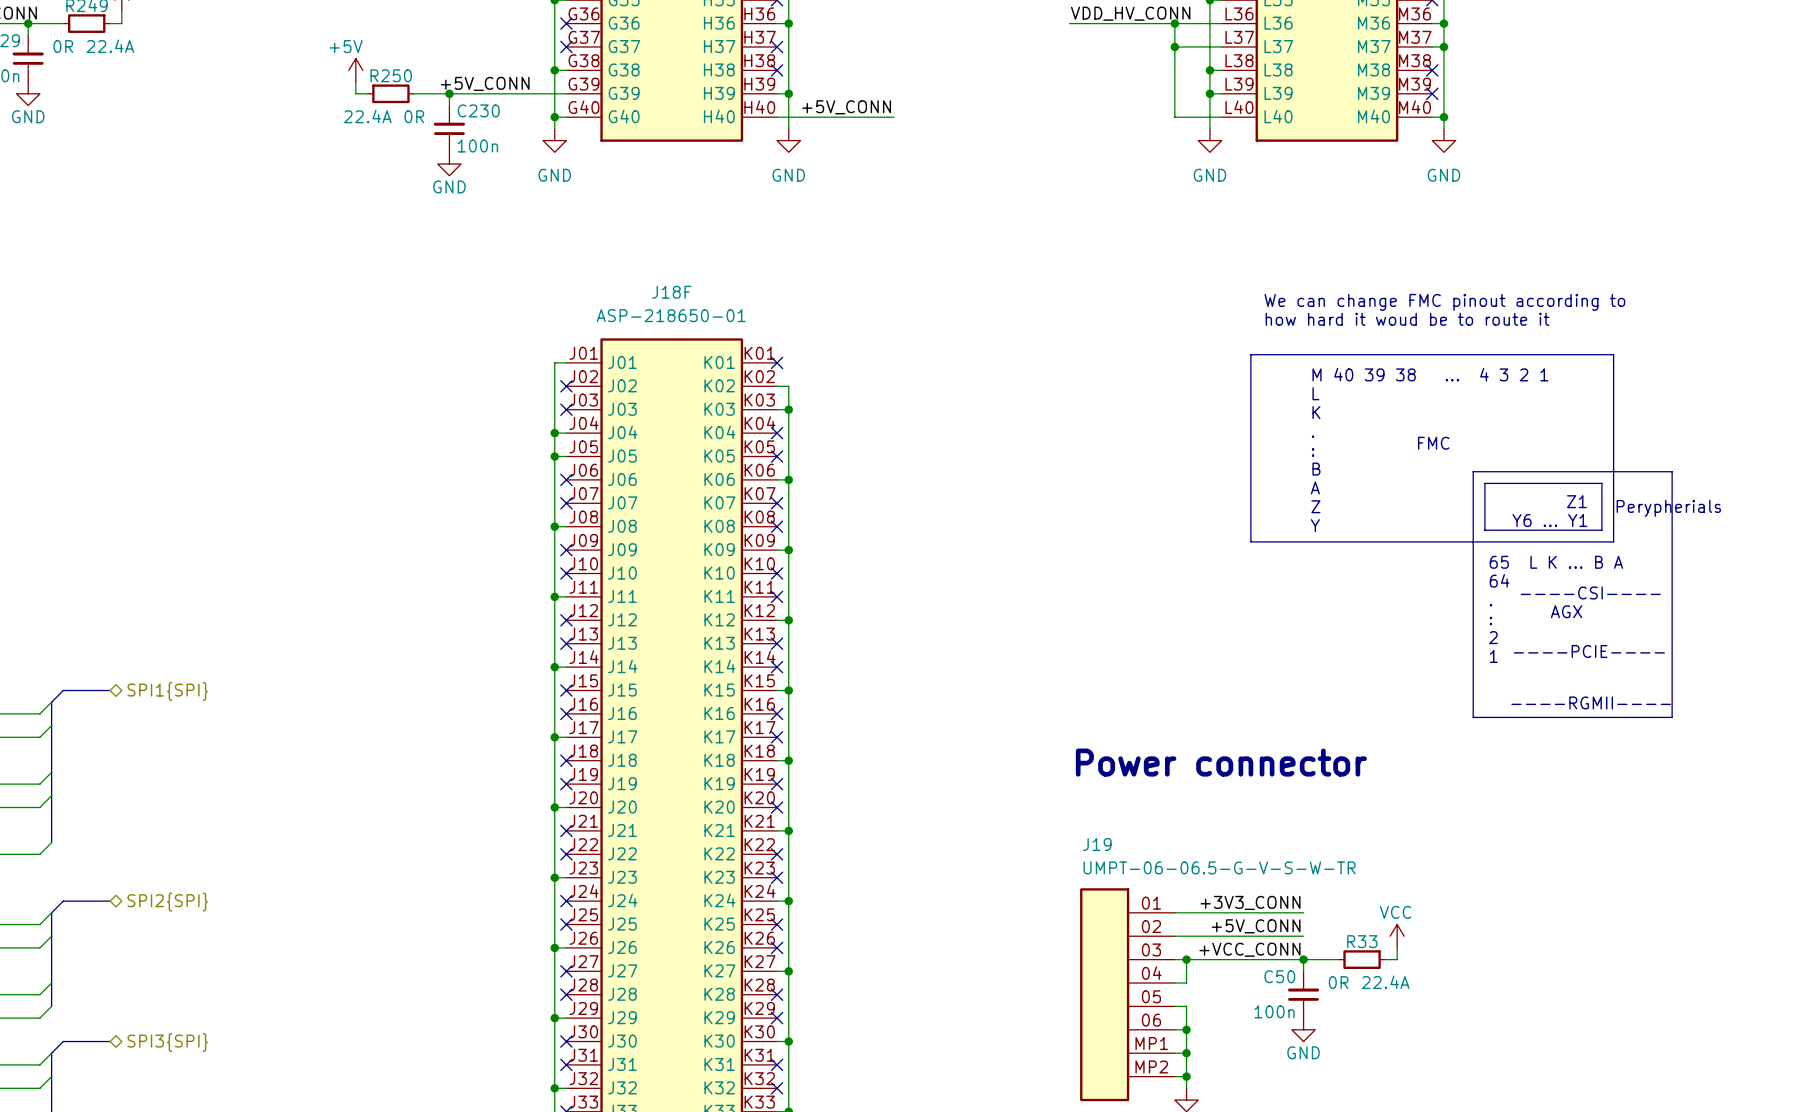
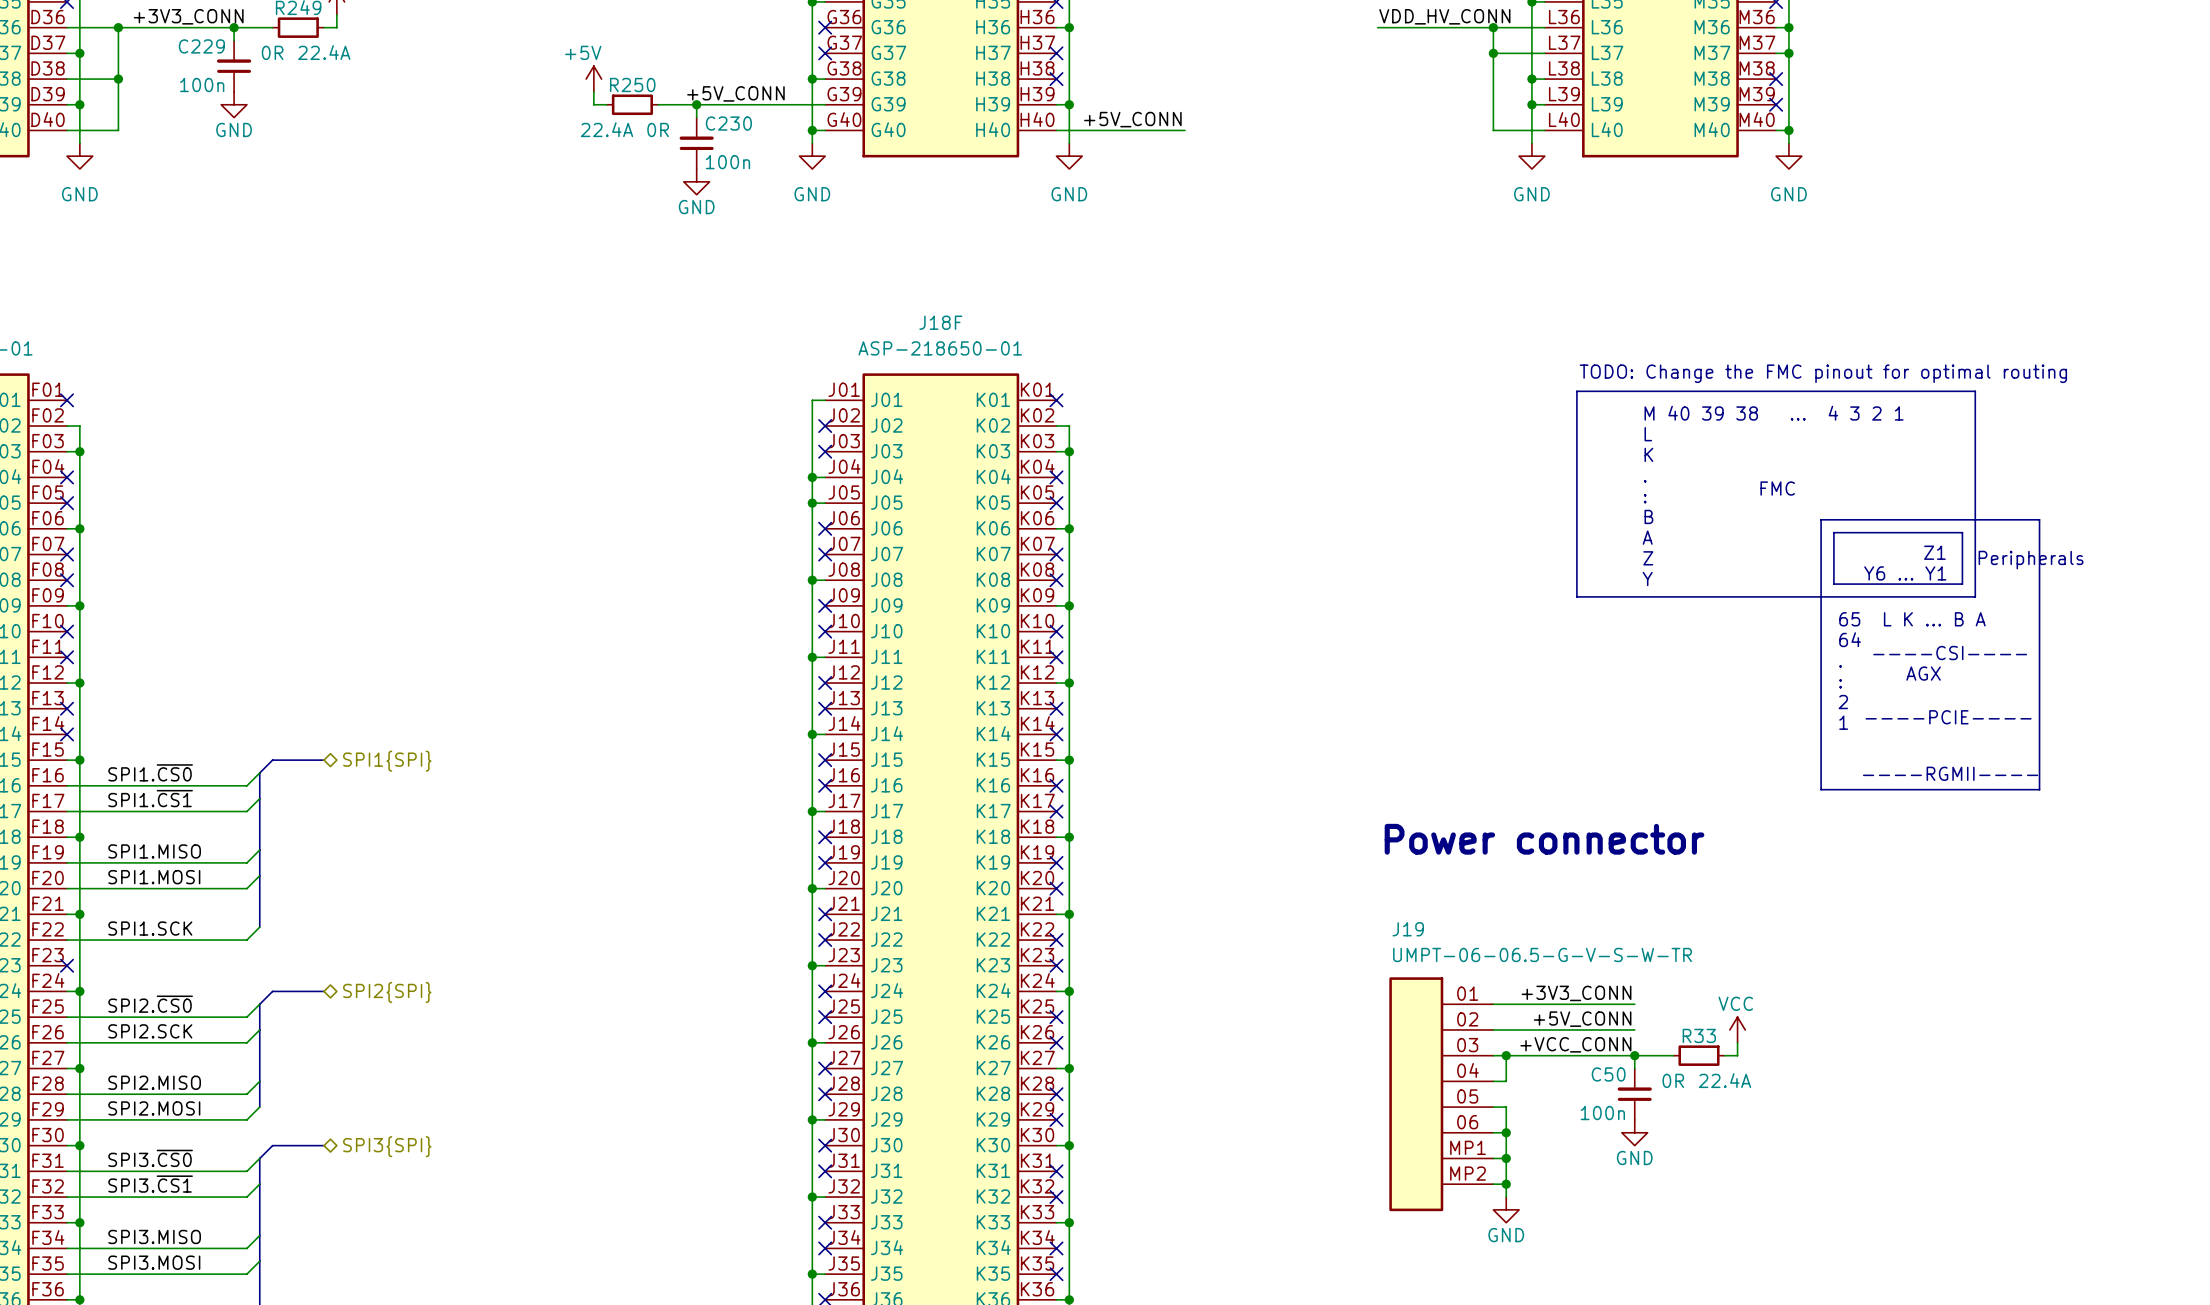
text: We can change FMC pinout according to (1444, 302) -> none
text: how hard it woud be to route it (1407, 319) -> none
text: none -> TODO: Change the FMC pinout for optimal routing (1823, 373)
text: Perypherials (1668, 508) -> Peripherals (2031, 560)

